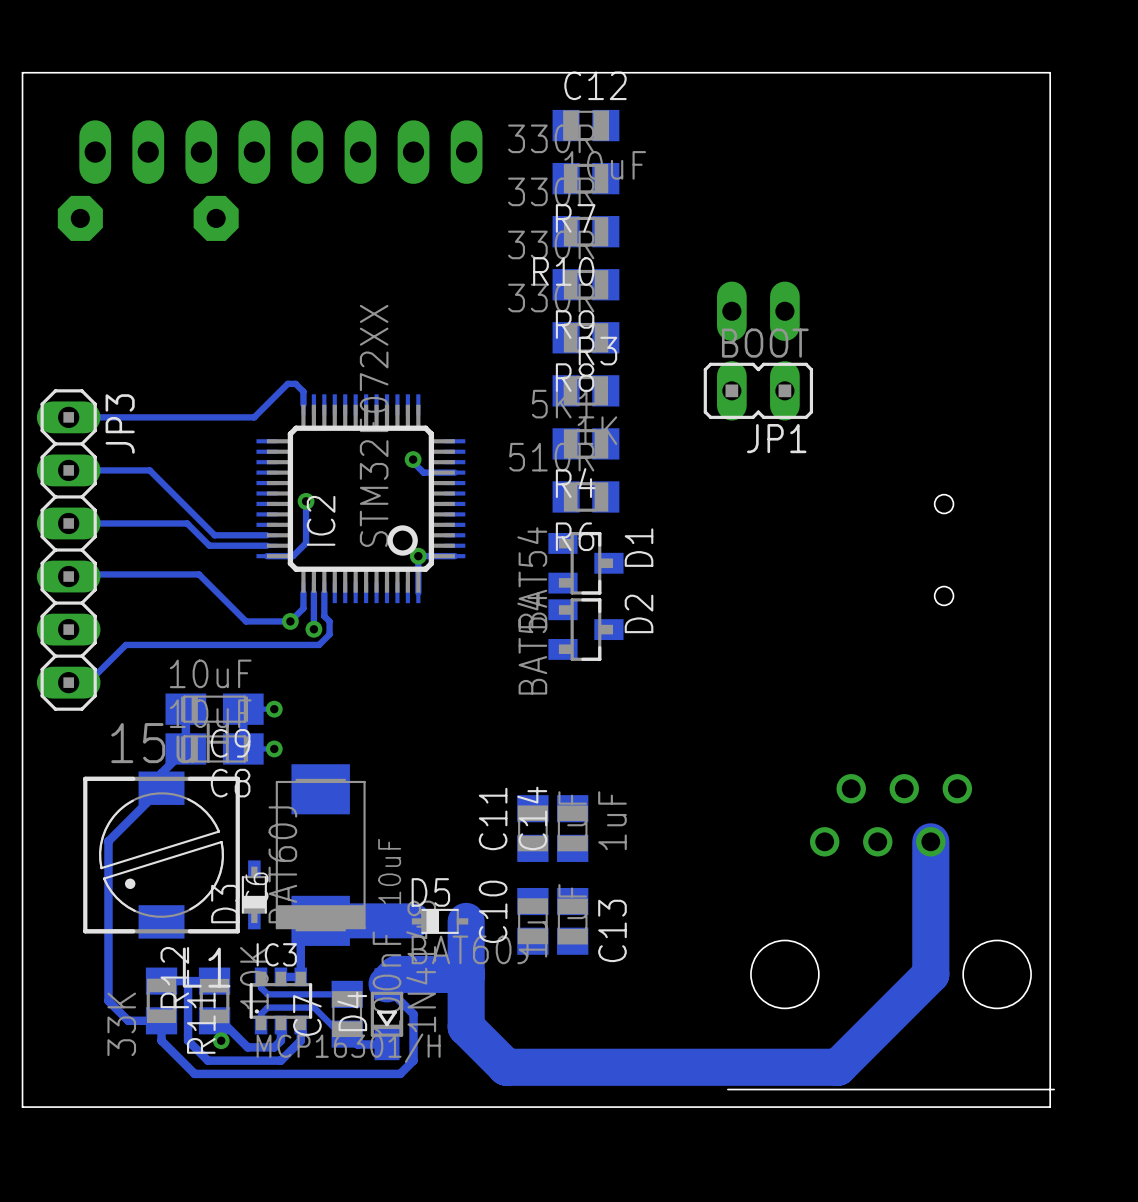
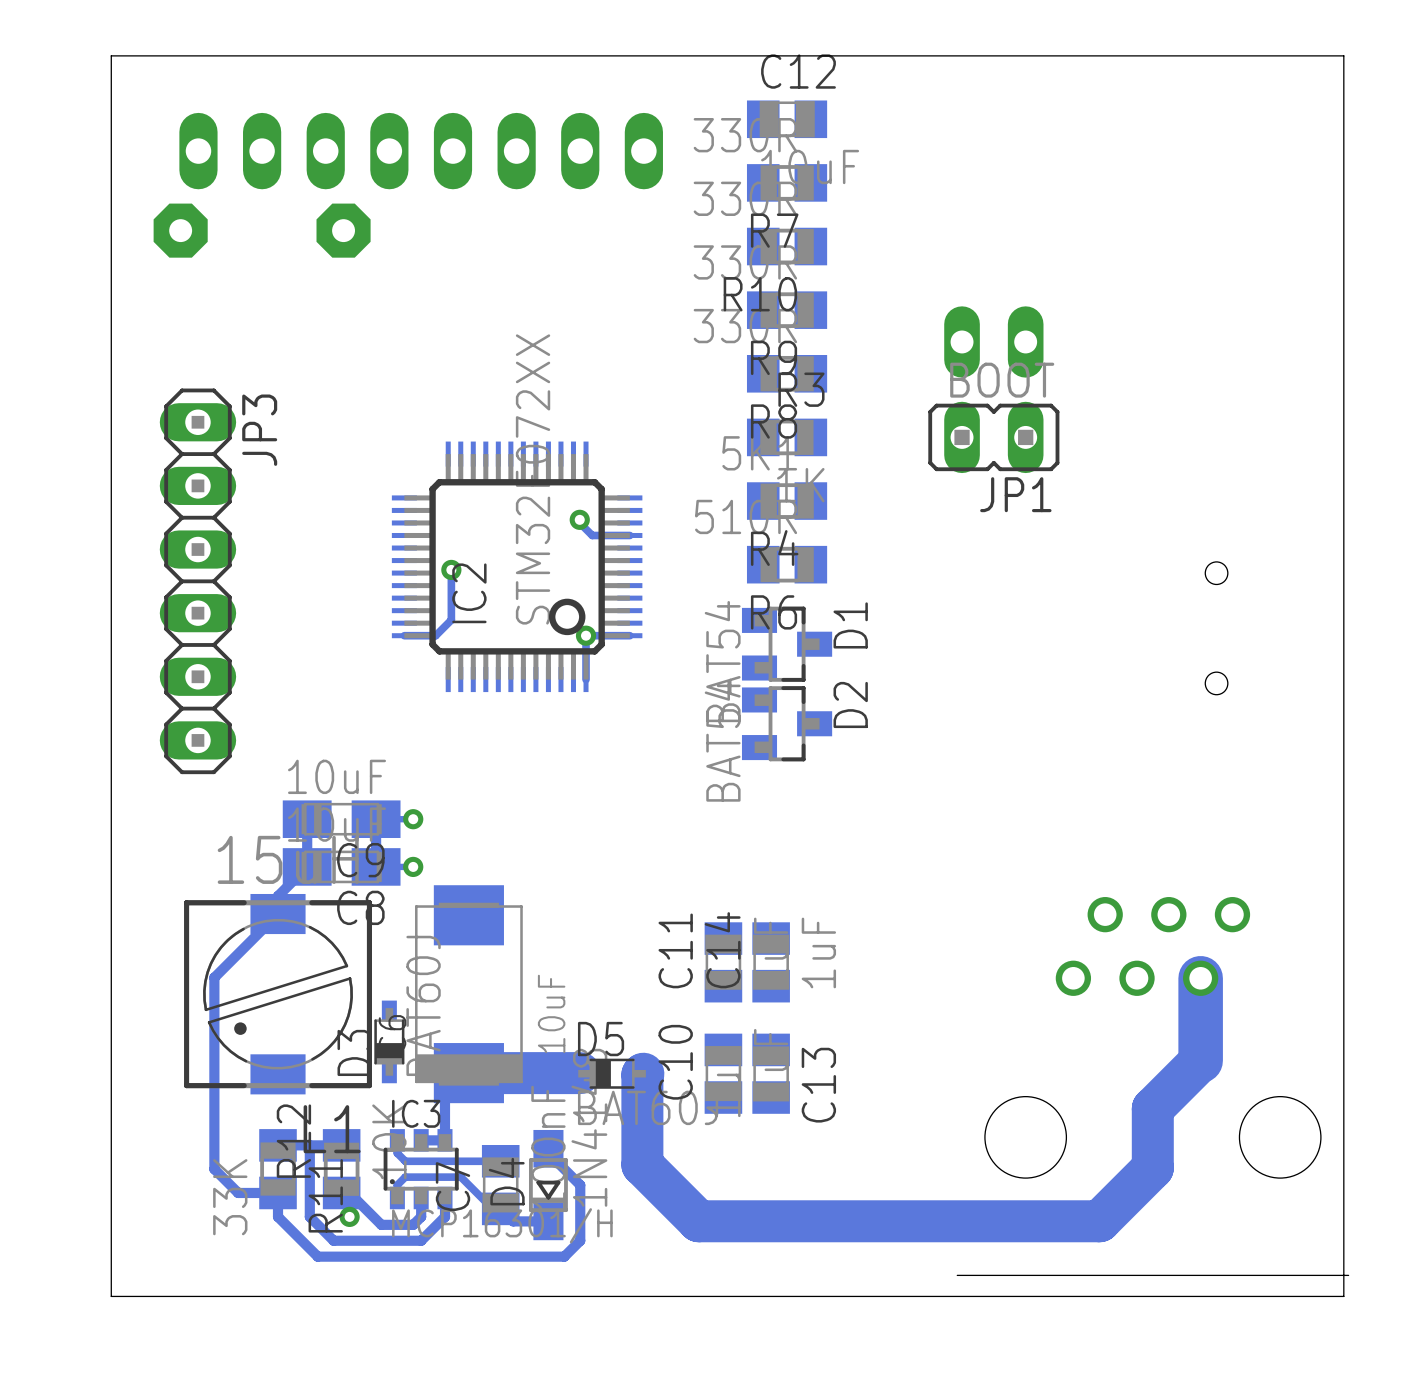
track: (303, 404) (303, 391) (295, 383) (287, 383) (254, 417) (68, 417) -> none
track: (68, 470) (149, 470) (214, 535) (266, 535) -> none
track: (68, 523) (187, 523) (209, 545) (266, 545) -> none
JP3 position: (68, 550) -> (197, 581)
track: (68, 576) (70, 574) (199, 574) (246, 621) (290, 621) (303, 608) (303, 592) -> none
track: (313, 592) (313, 629) -> none
track: (324, 592) (324, 616) (329, 621) (329, 634) (319, 644) (125, 644) (88, 682) (68, 682) -> none
via: (290, 621) -> none
via: (313, 629) -> none
track: (930, 910) (930, 974) (837, 1067) (506, 1067) (466, 1027) (466, 921) -> (1200, 1060) (1152, 1108) (1152, 1168) (1099, 1221) (698, 1221) (642, 1164) (643, 1073)
track: (466, 974) (396, 974) (387, 983) -> none

